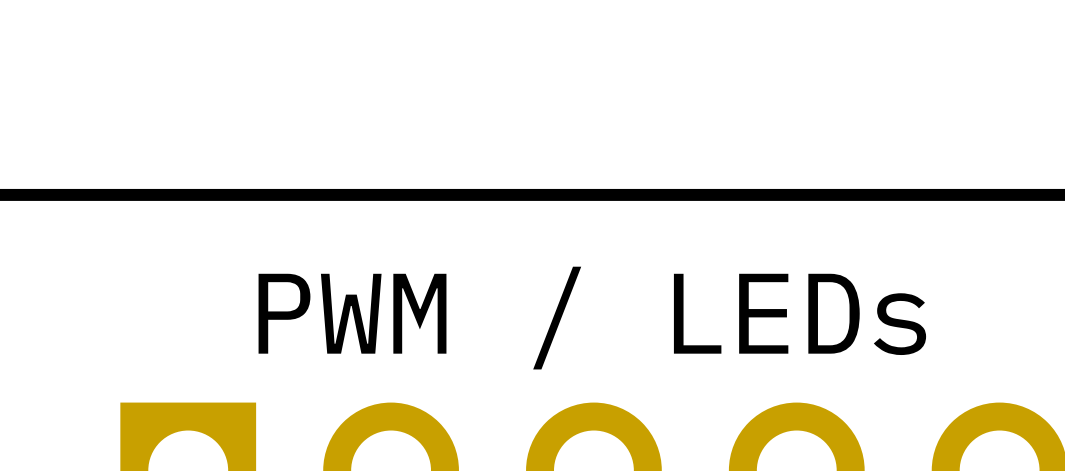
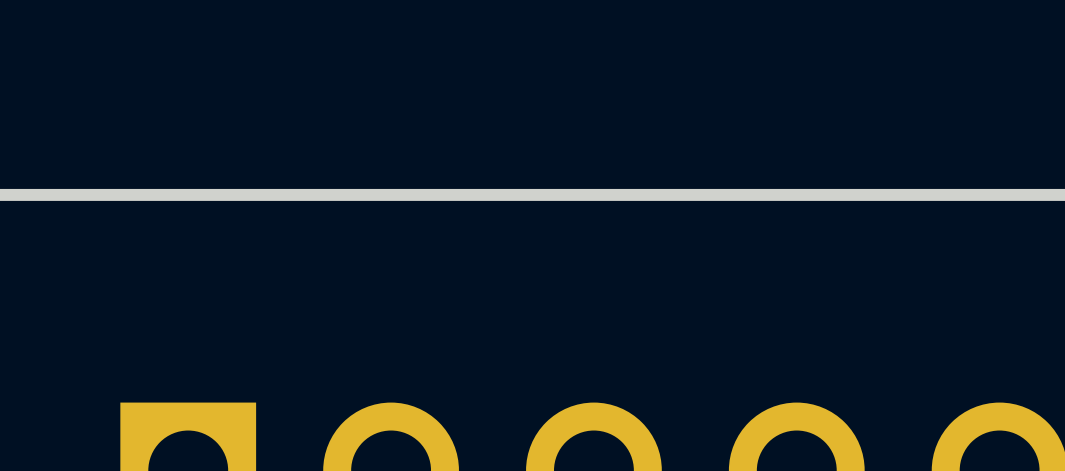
text: PWM / LEDs (592, 318) -> none

